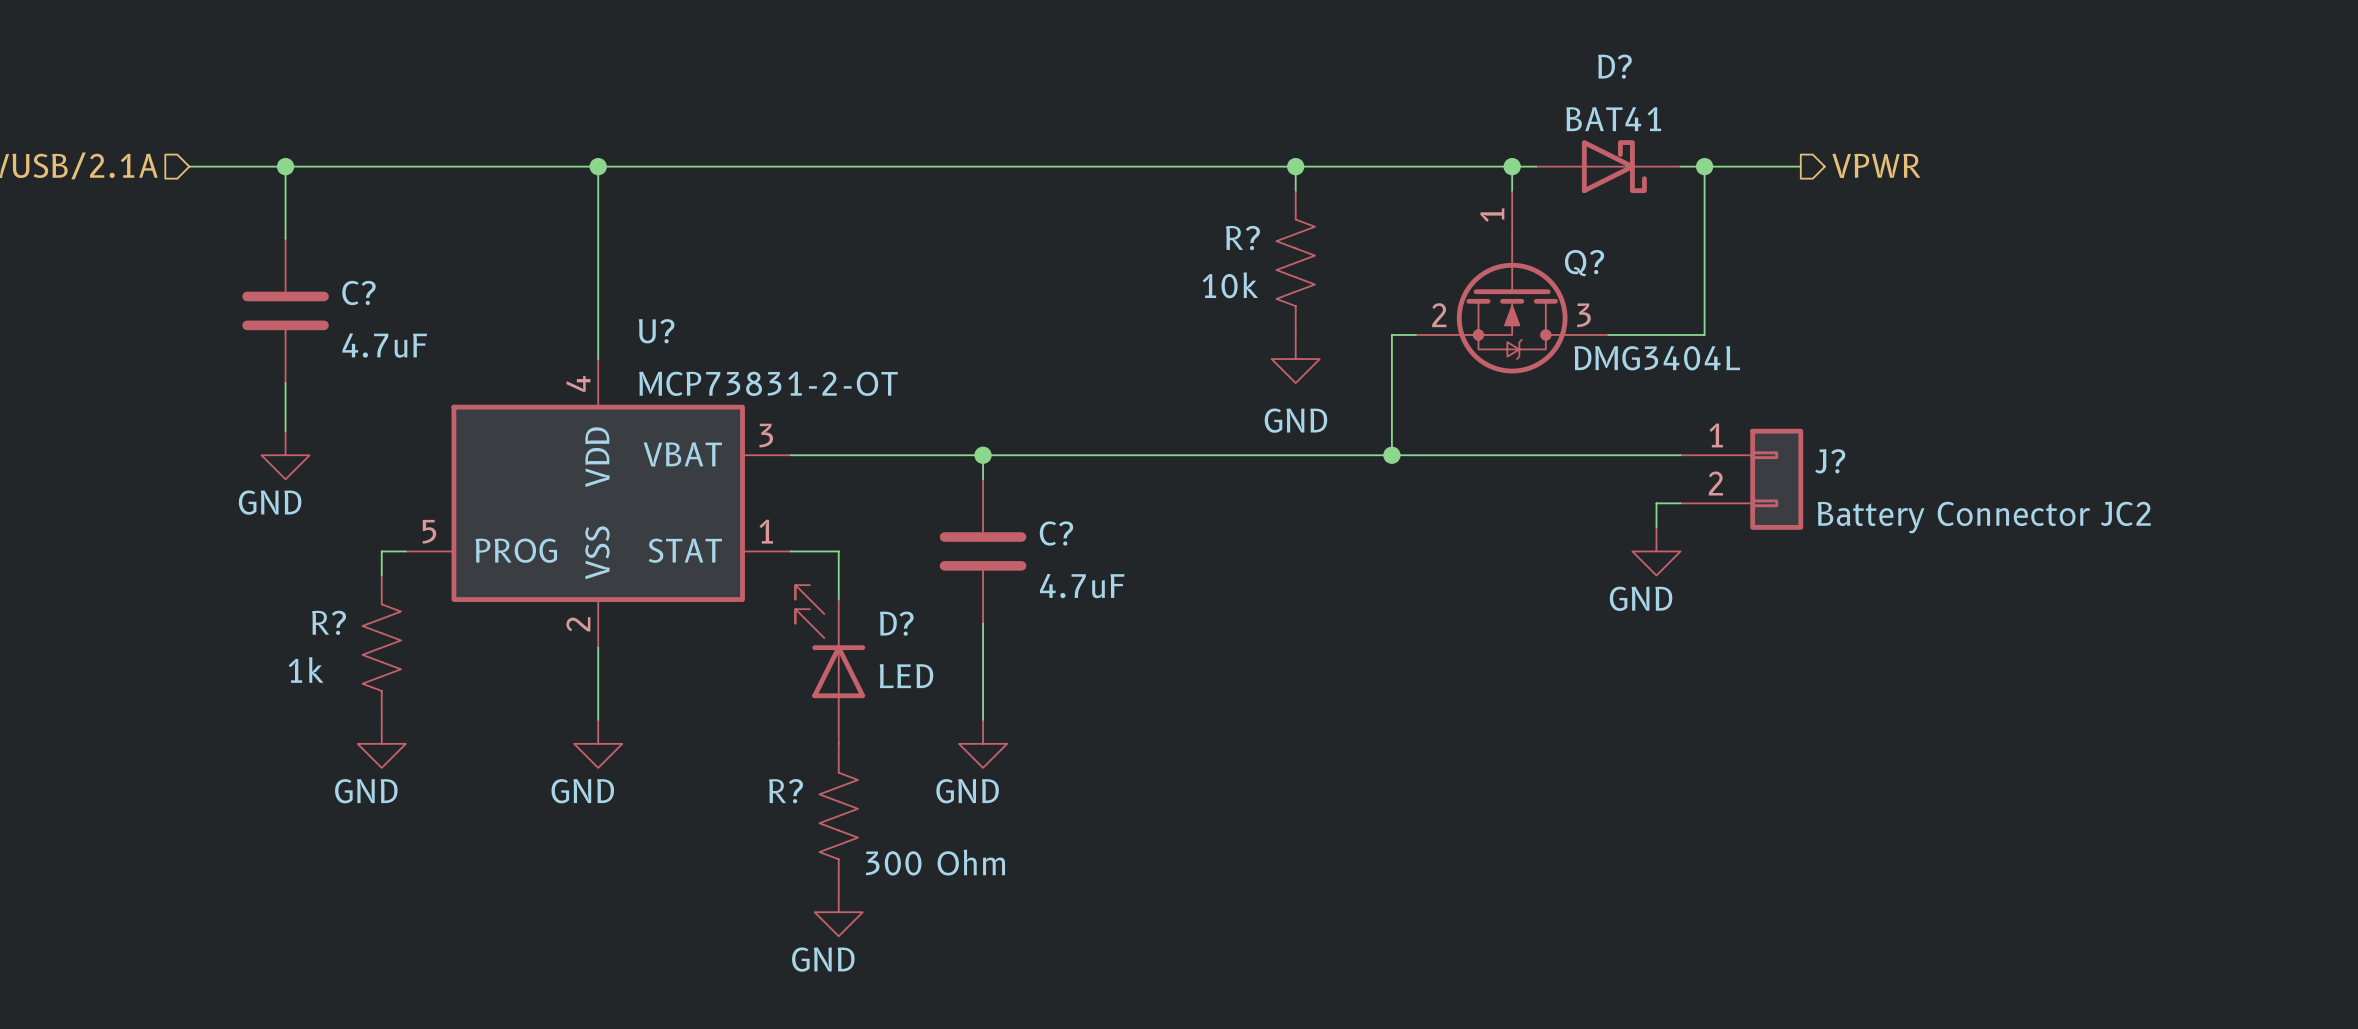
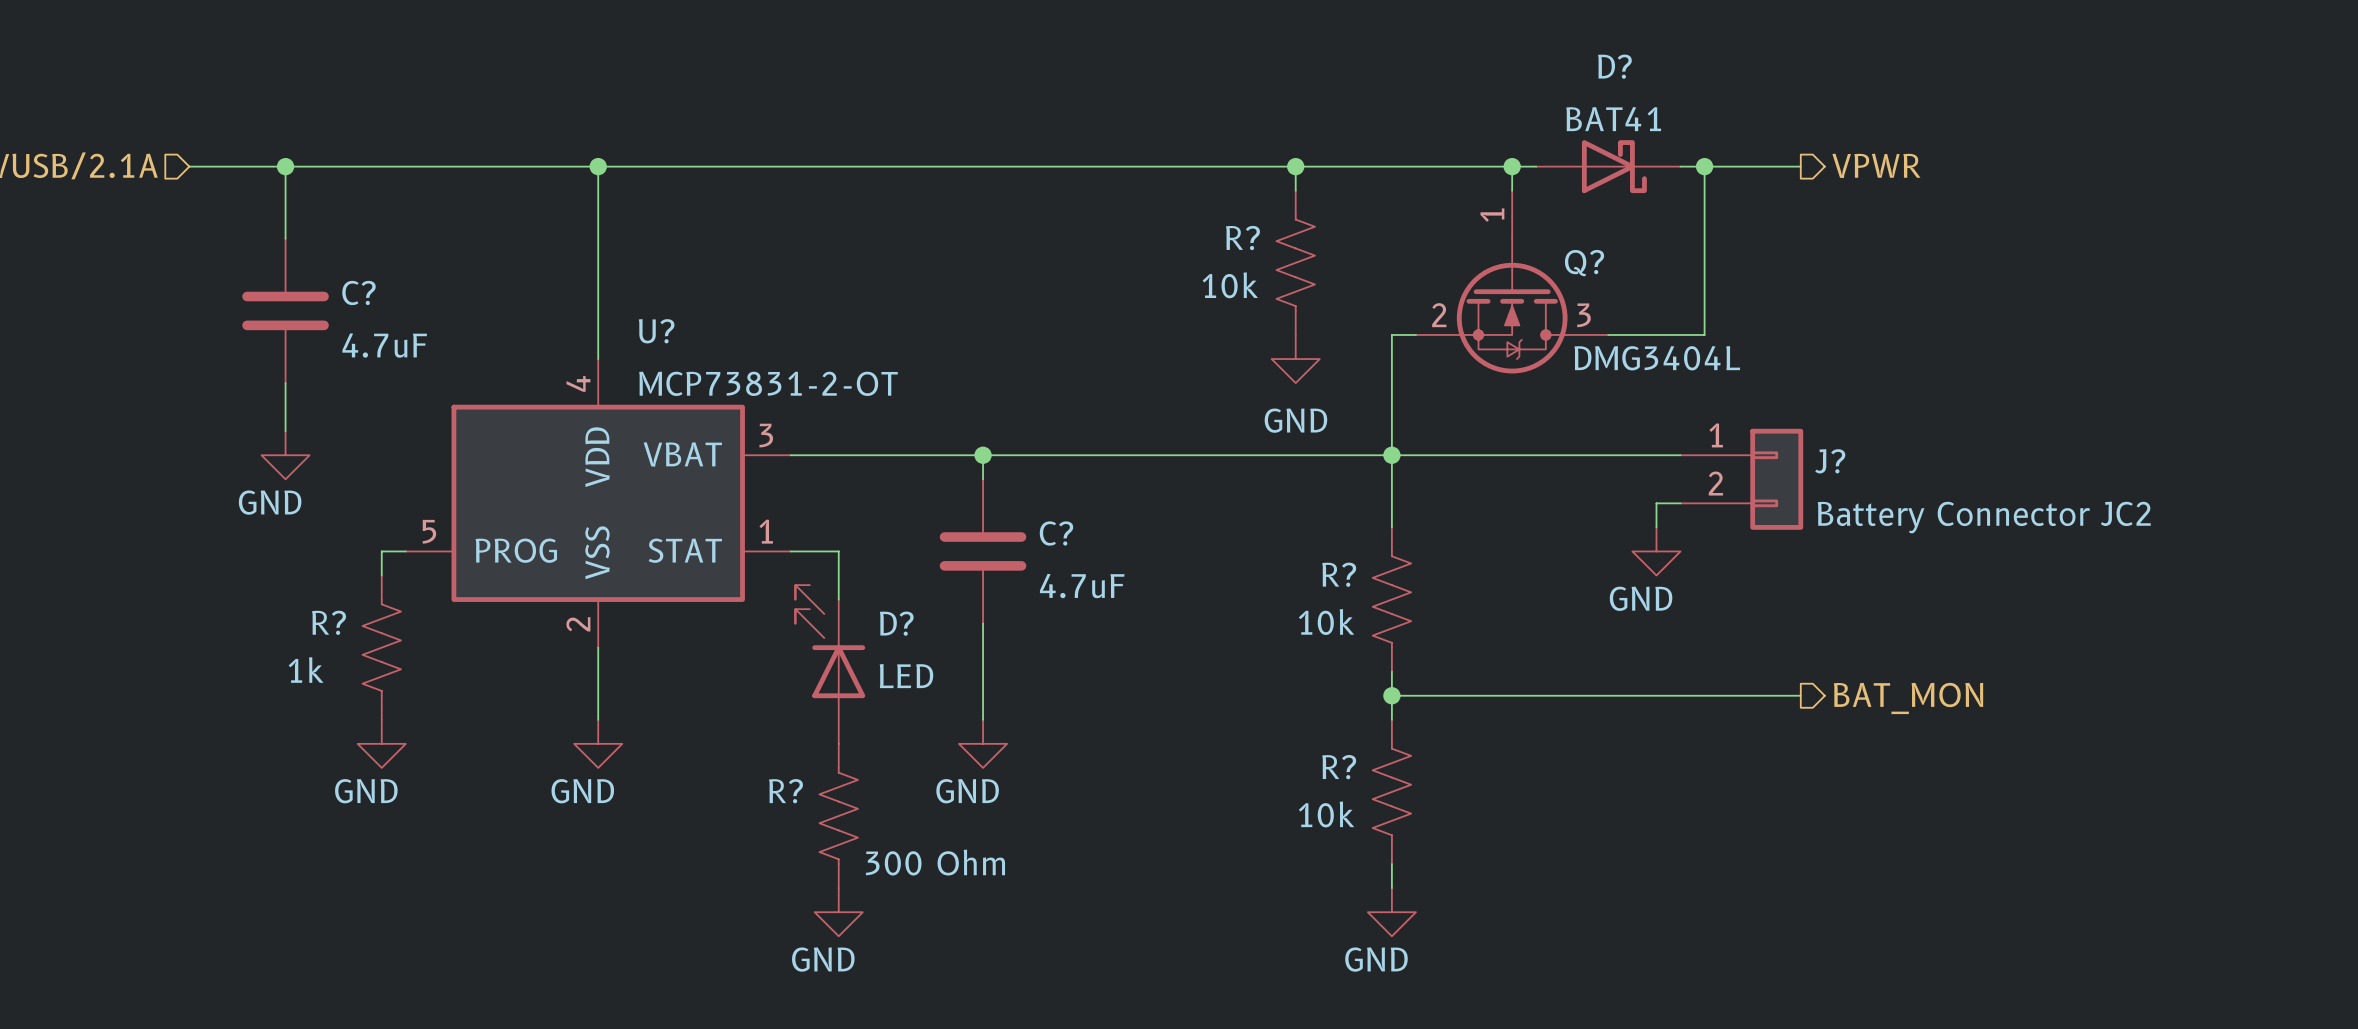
wire: none -> (1391, 455) (1391, 527)
R?: none -> 10k (1391, 599)
wire: none -> (1391, 671) (1391, 719)
wire: none -> (1391, 695) (1800, 695)
junction: none -> (1391, 695)
hierarchical label: none -> BAT_MON (1908, 698)
R?: none -> 10k (1391, 791)
wire: none -> (1391, 864) (1391, 888)
power symbol: none -> GND (1391, 912)

